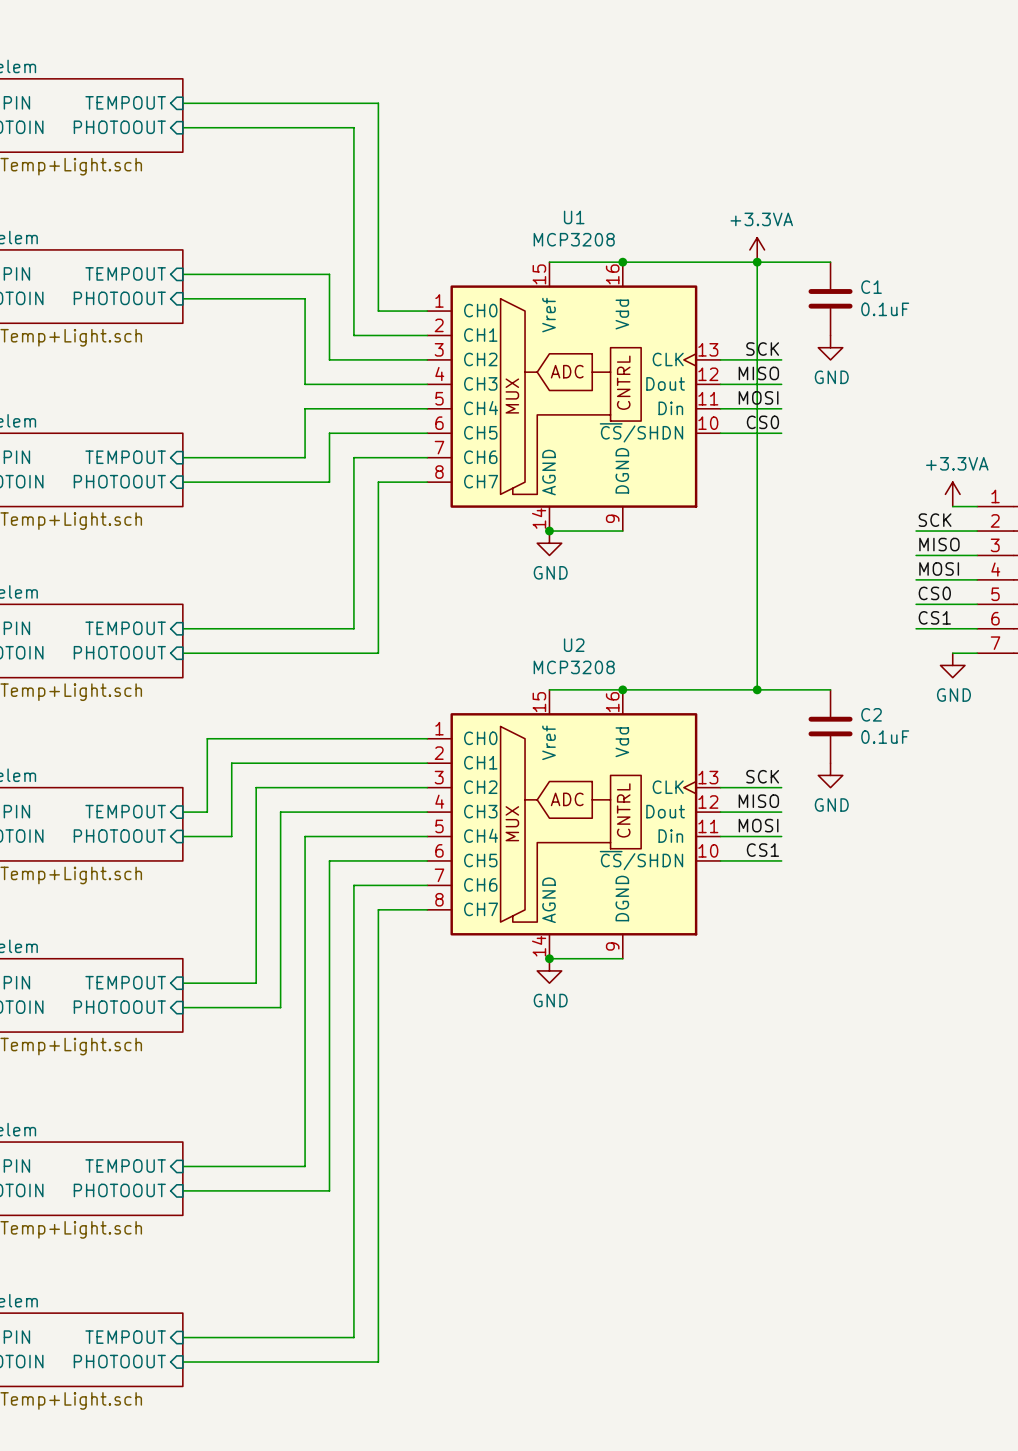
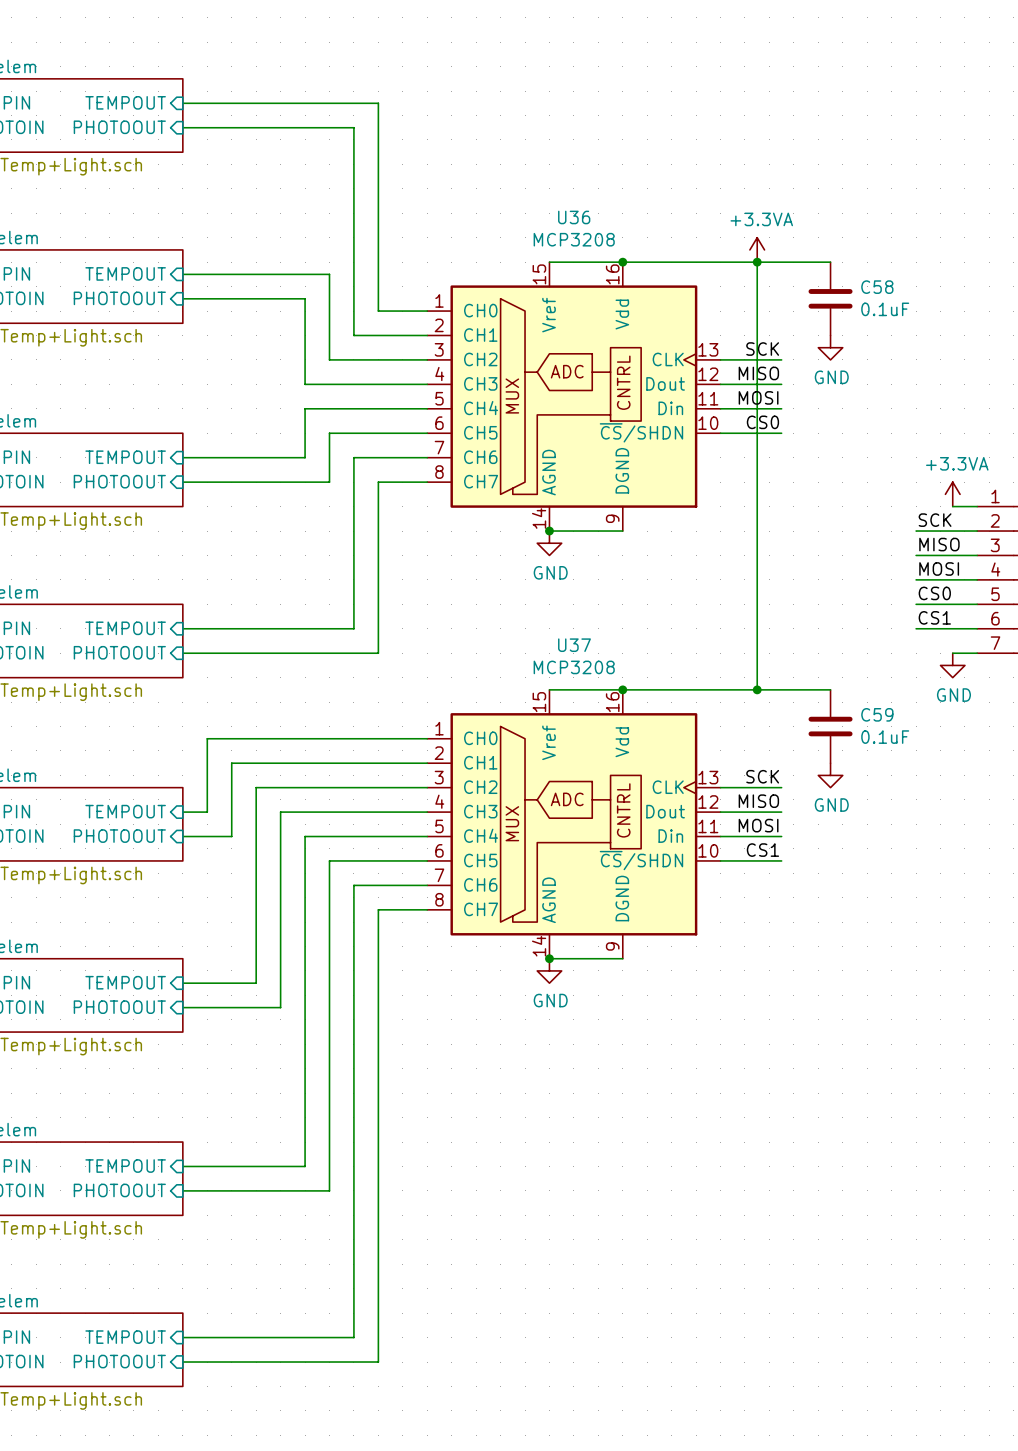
U1 name: U1 (574, 217) -> U36 (574, 217)
C1 name: C1 (871, 287) -> C58 (877, 287)
U2 name: U2 (574, 645) -> U37 (574, 645)
C2 name: C2 (871, 714) -> C59 (877, 714)

